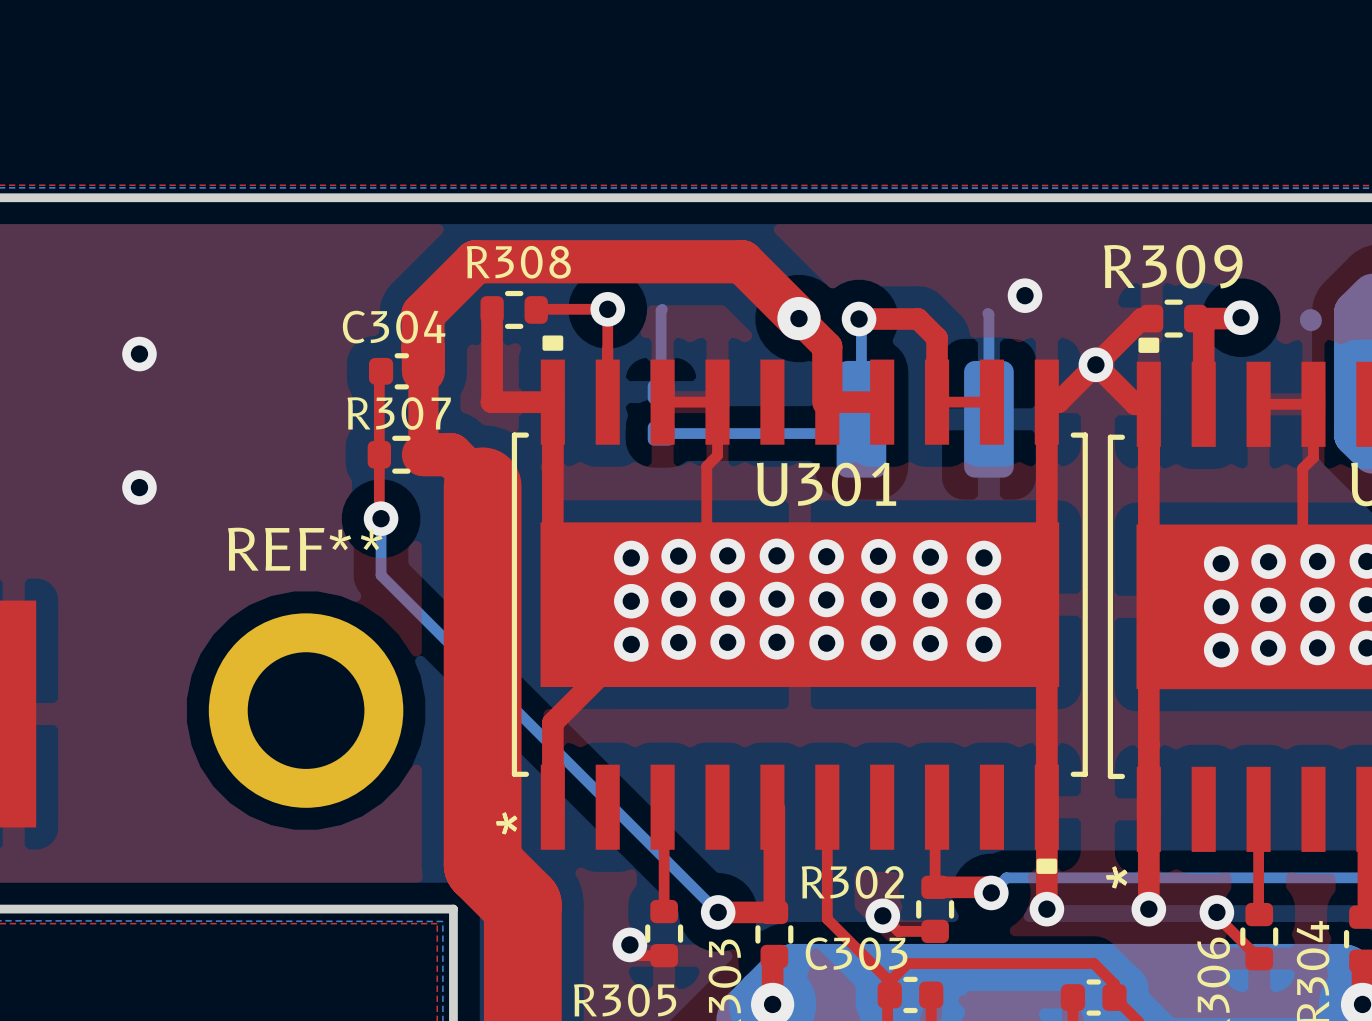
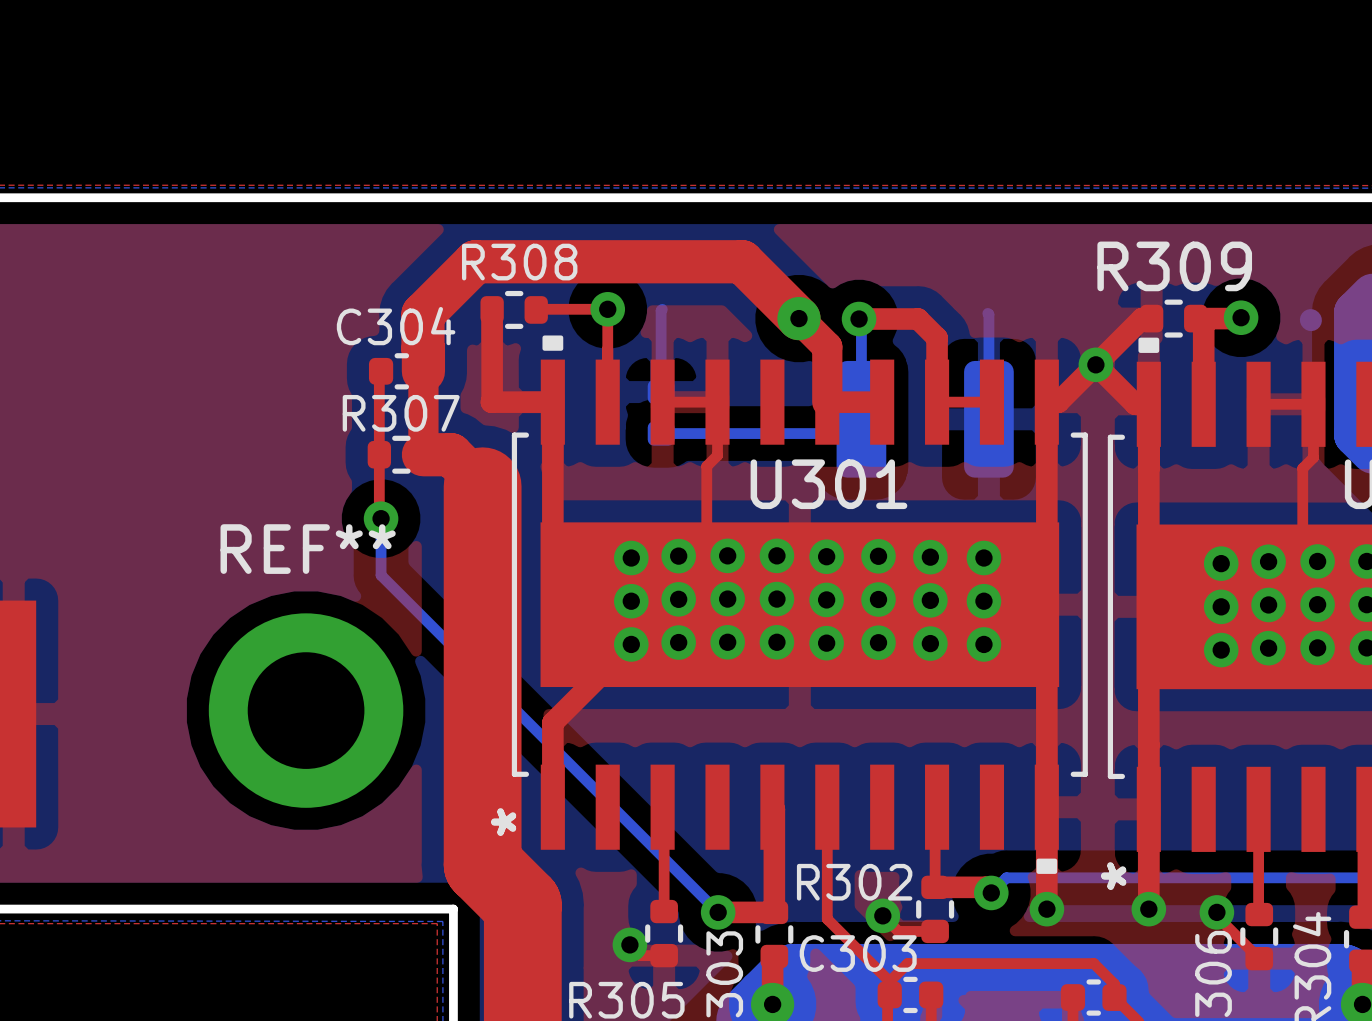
via: (1025, 295) -> none
via: (139, 354) -> none
via: (139, 487) -> none

